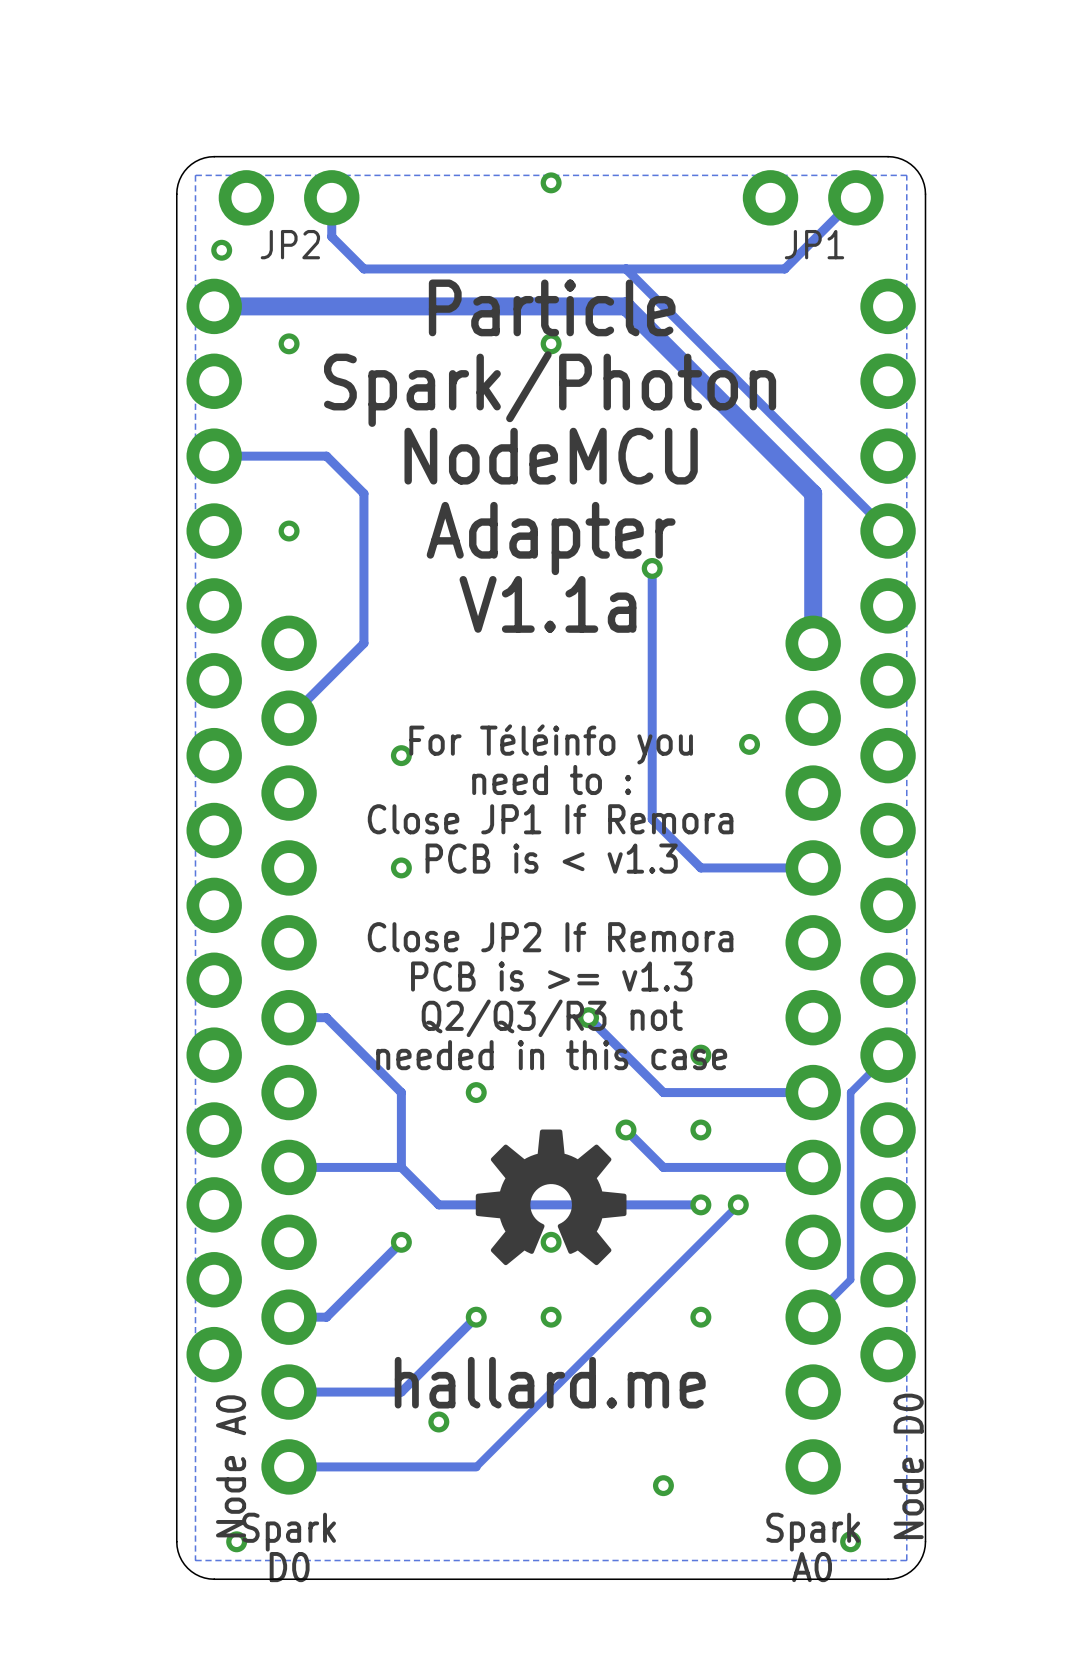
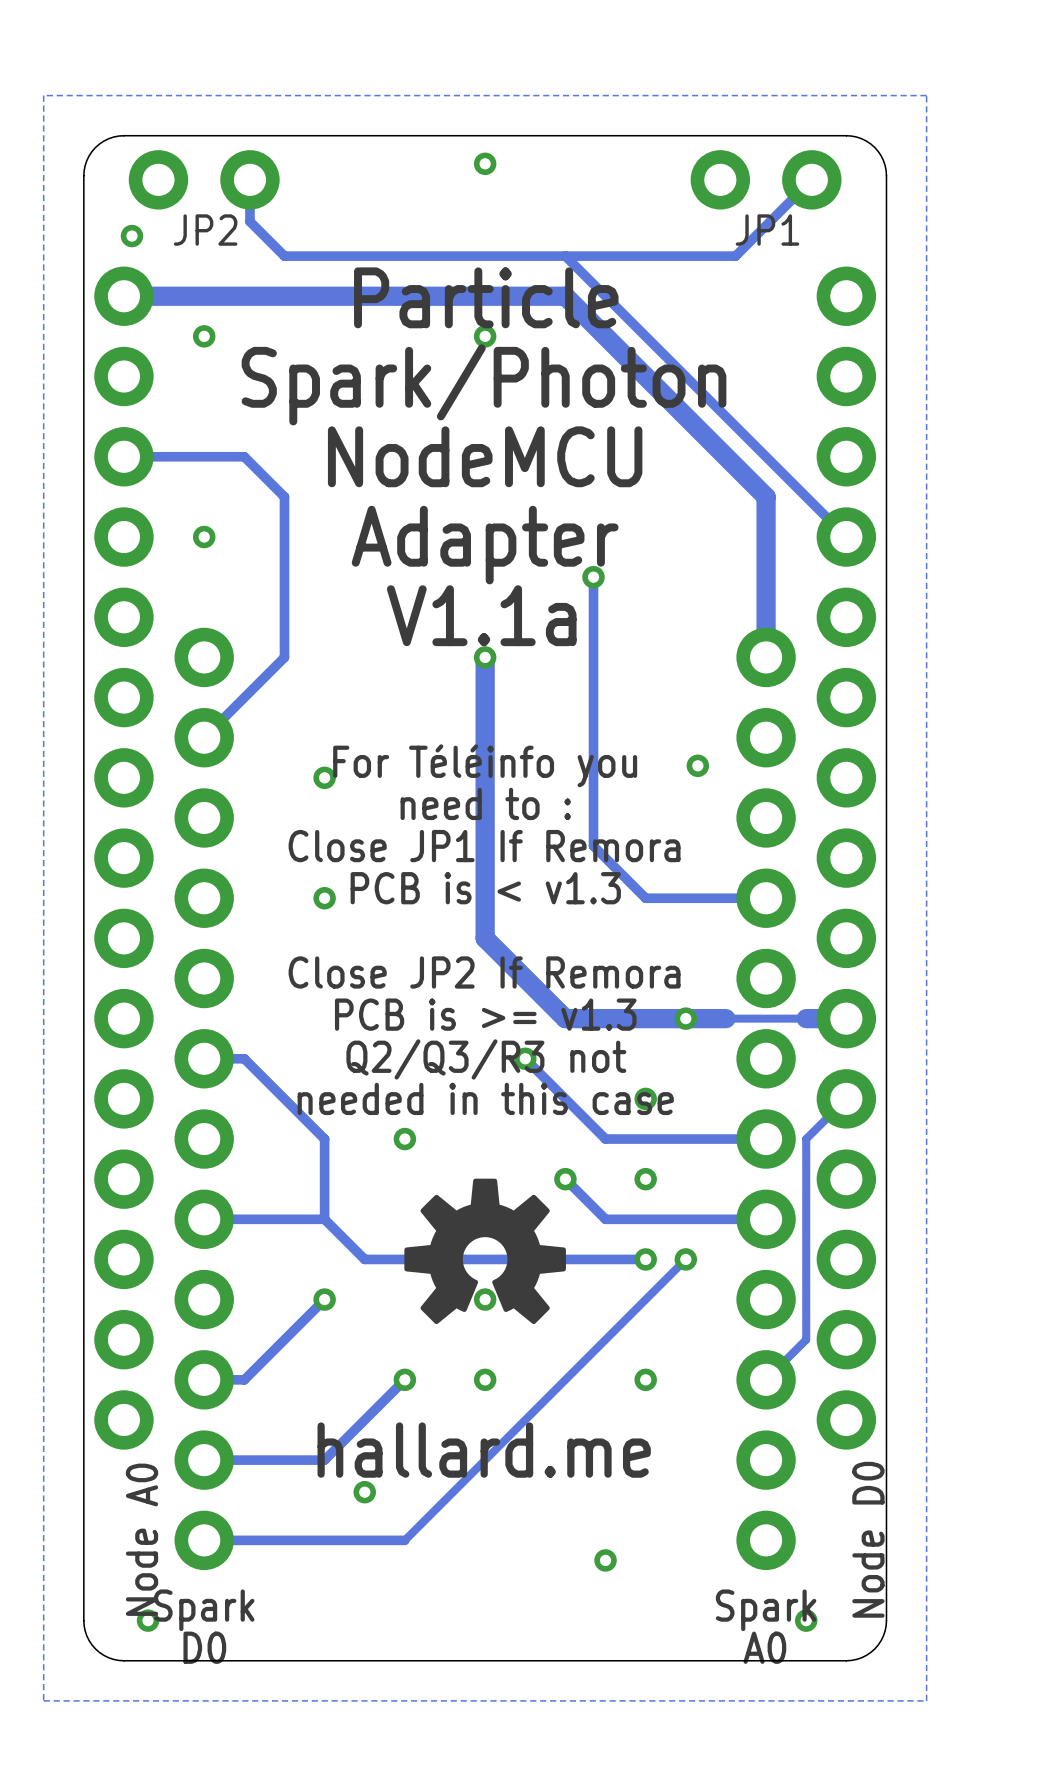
zone outline: (906, 175) (195, 175) (195, 1560) (906, 1560) (906, 175) -> (926, 95) (926, 1700) (43, 1700) (43, 95) (926, 95)
track: none -> (485, 657) (485, 938) (565, 1018) (846, 1018)
via: none -> (485, 657)
via: none -> (685, 1018)

